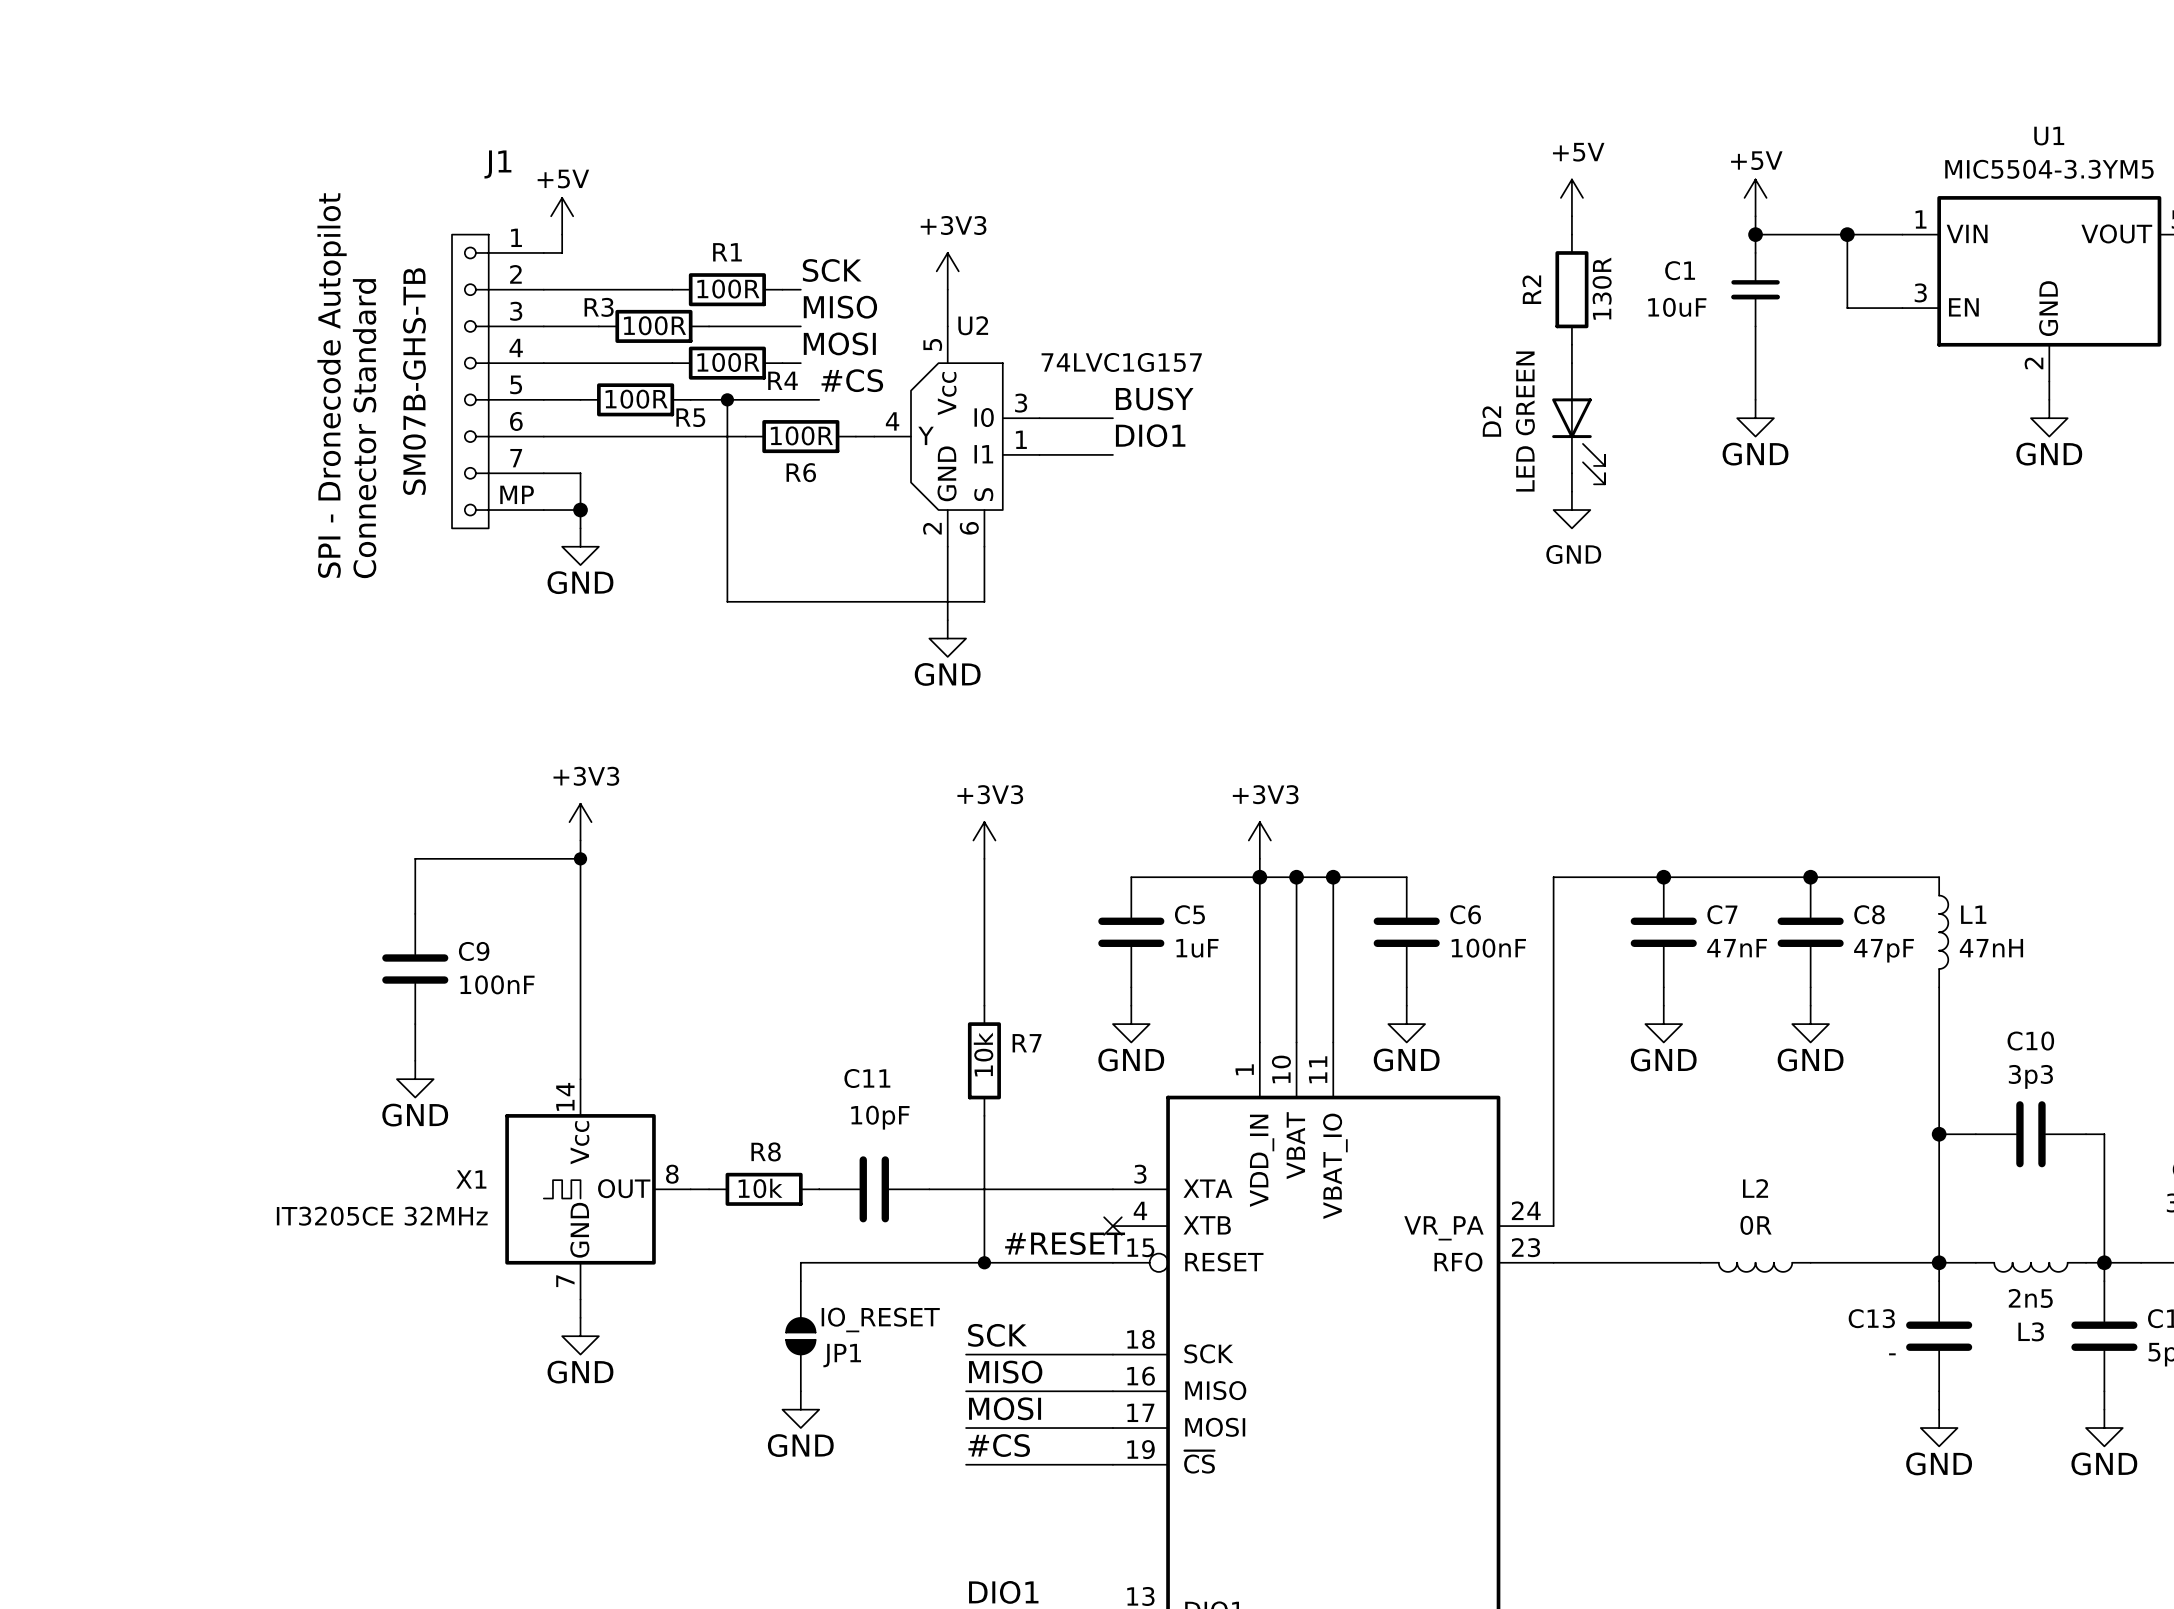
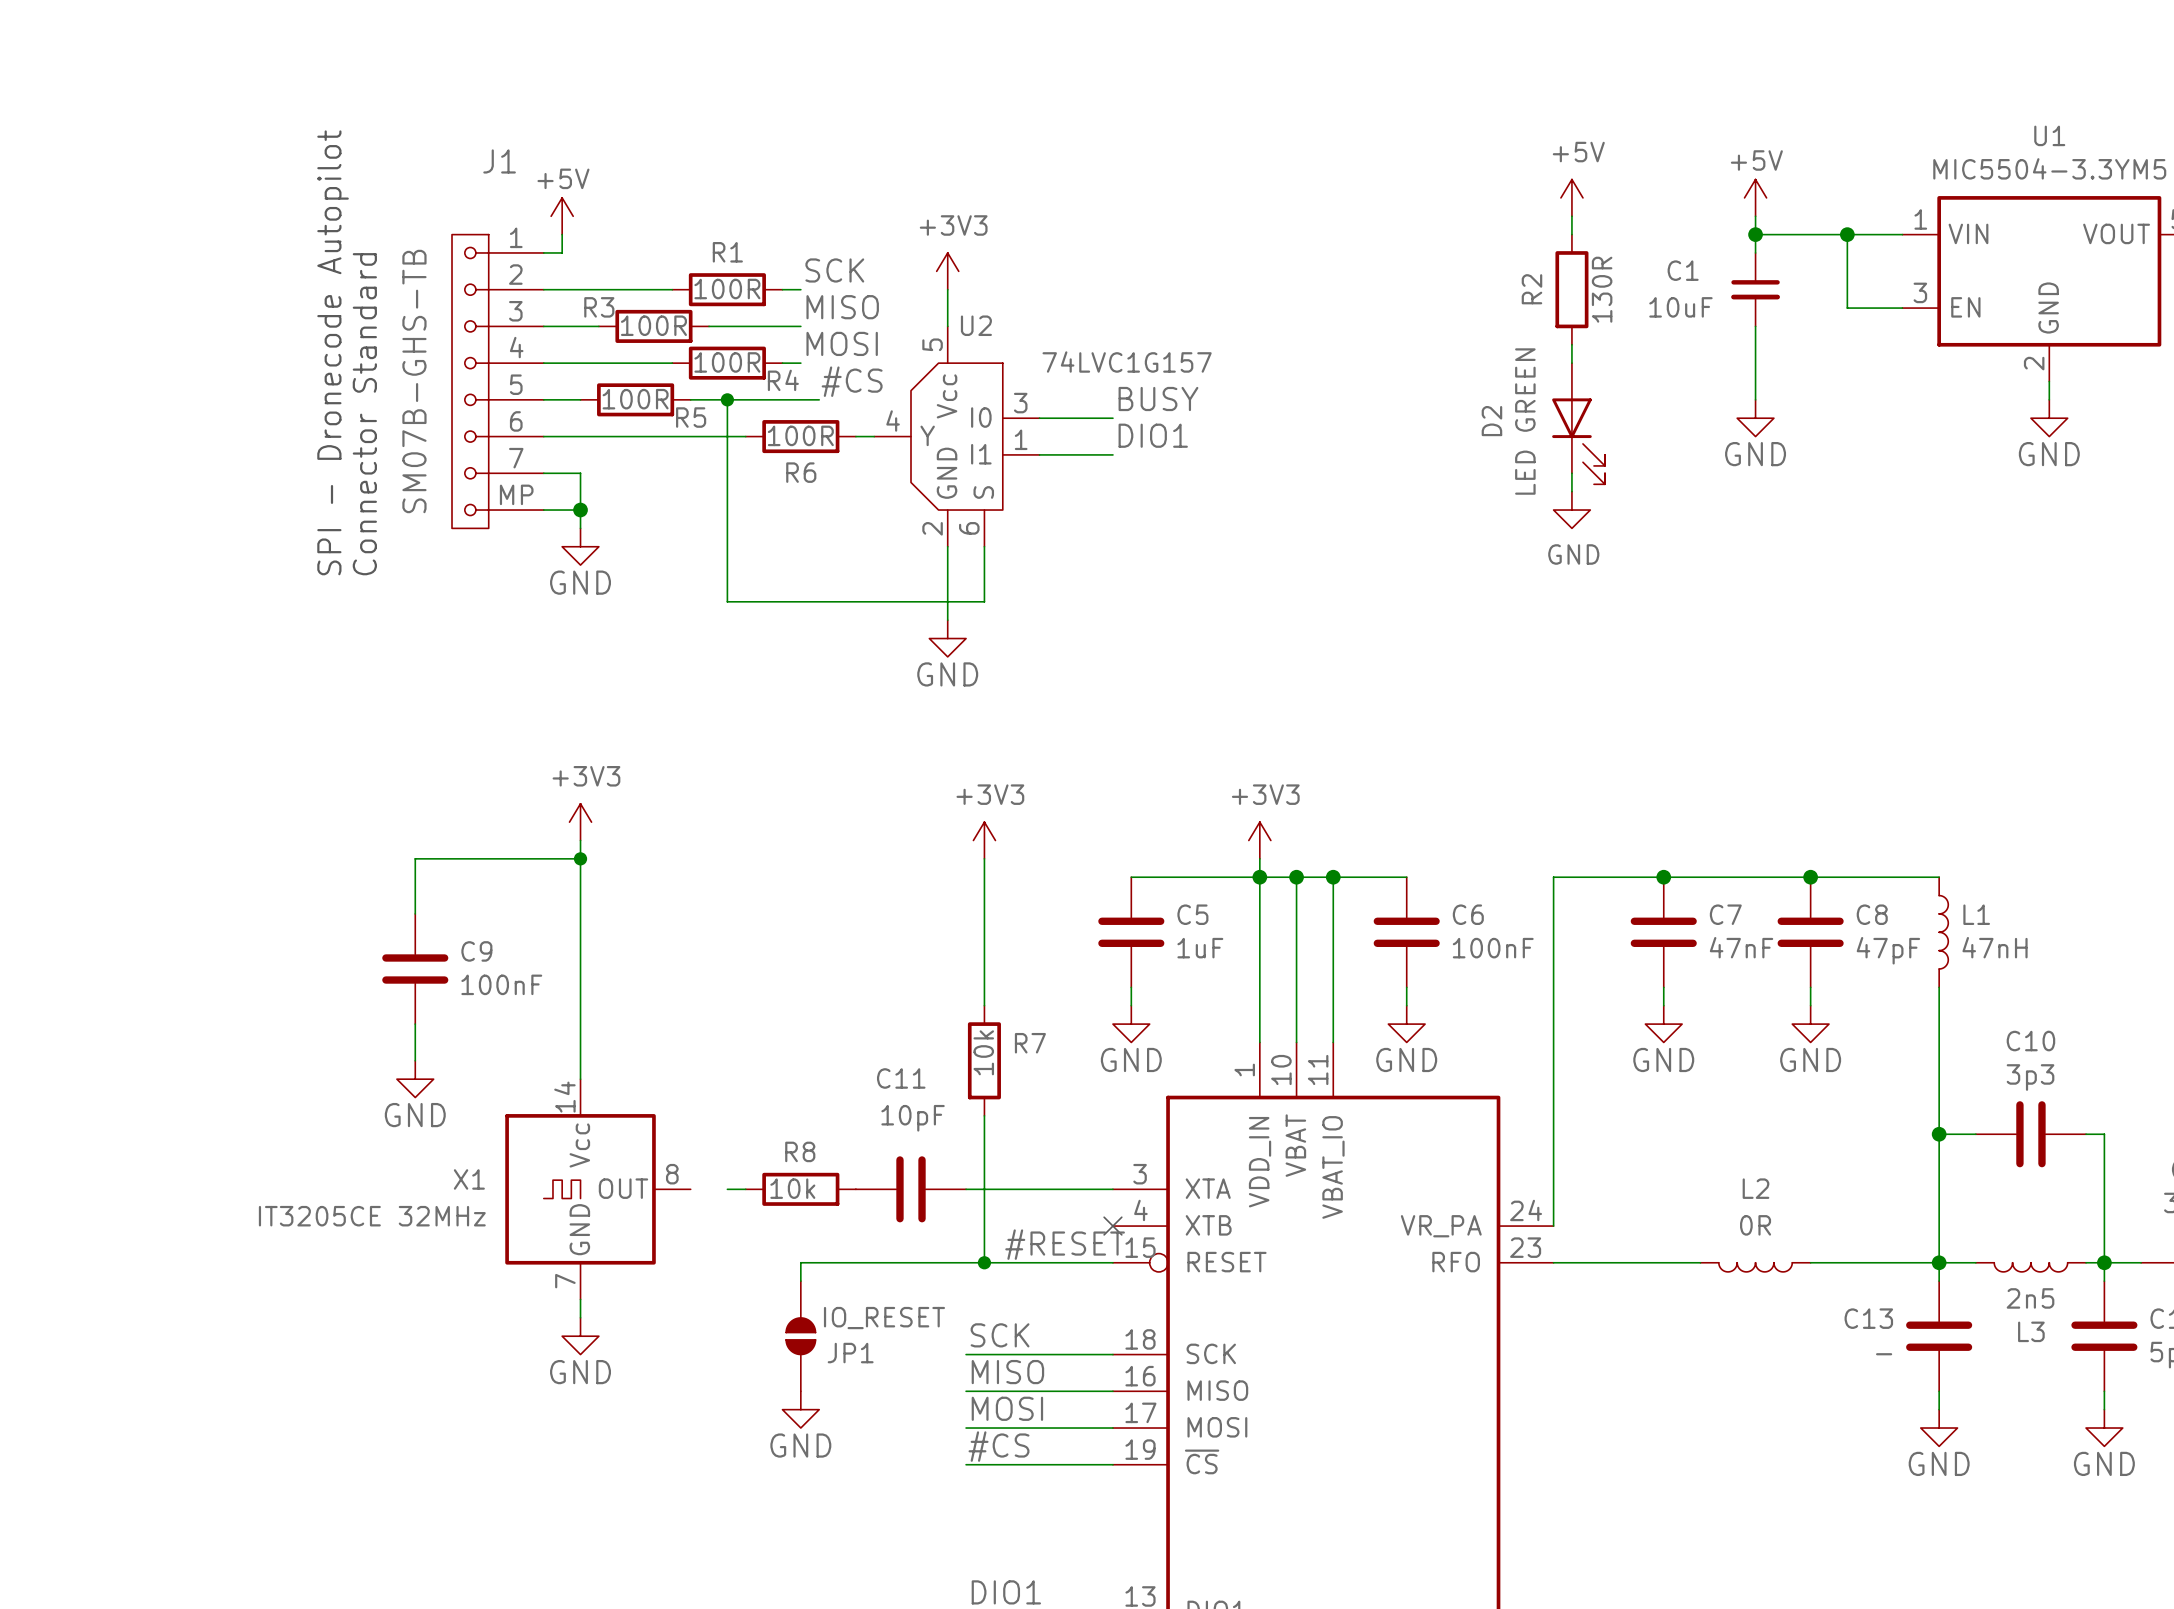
wire: (690, 1189) (709, 1189) -> (727, 1189) (745, 1189)
R8 position: (764, 1189) -> (800, 1189)
C11 position: (874, 1189) -> (911, 1189)

